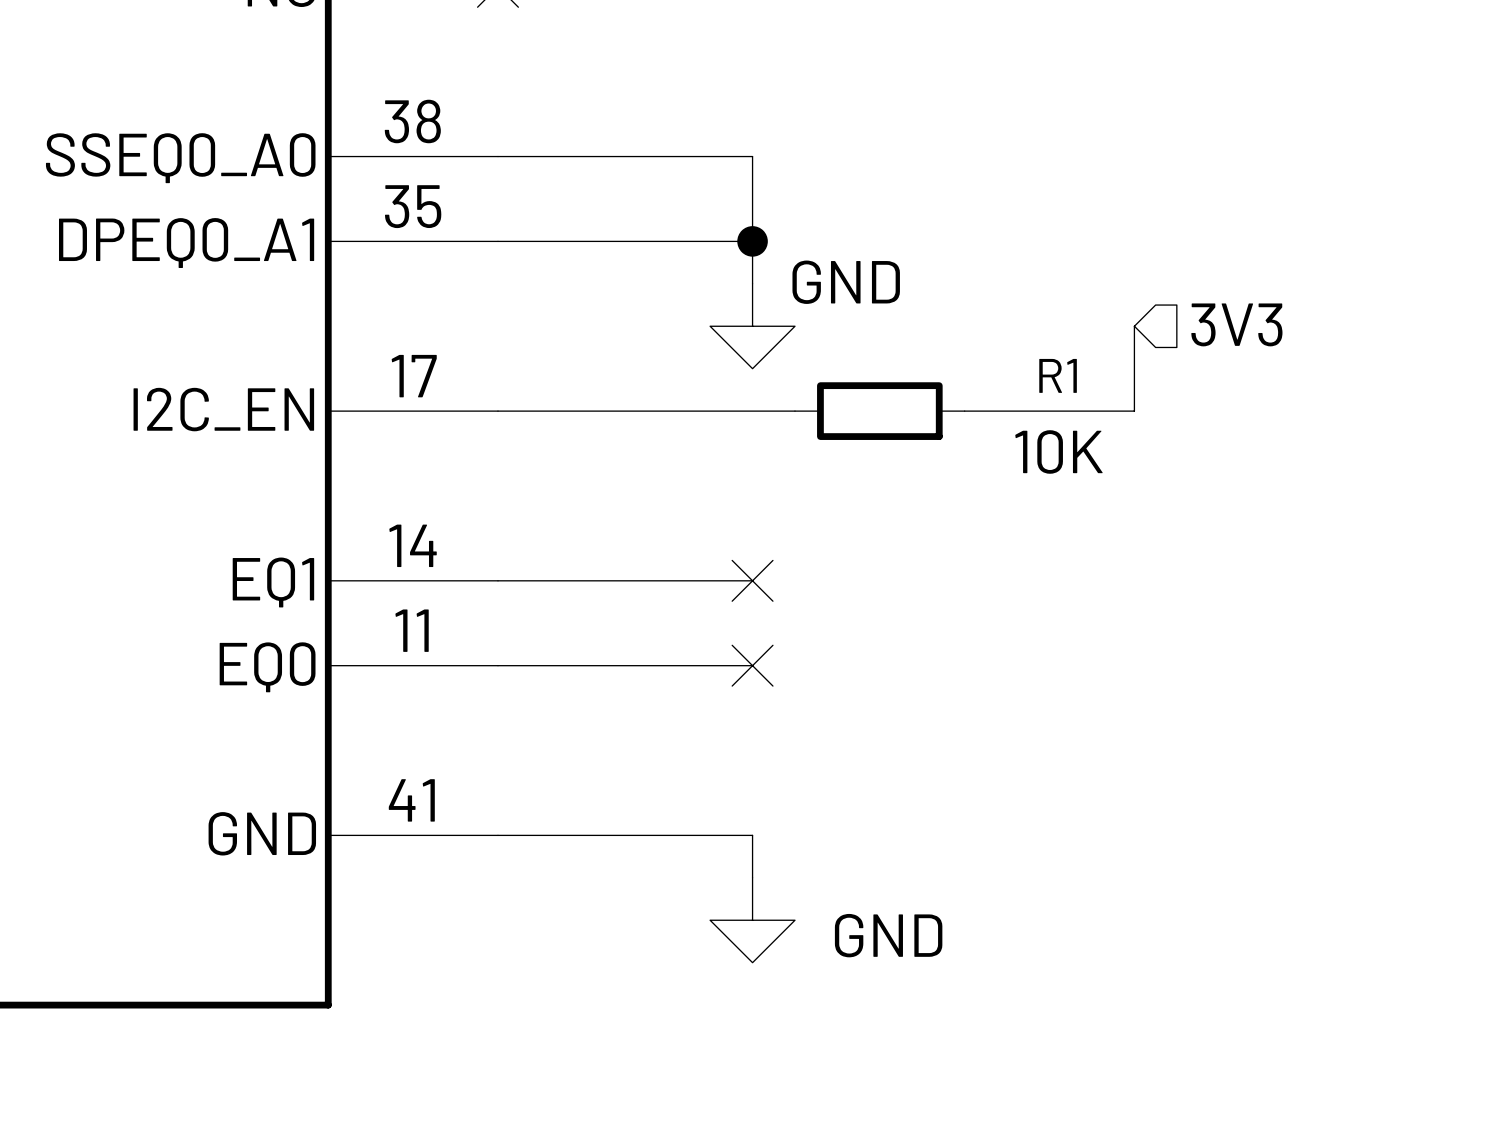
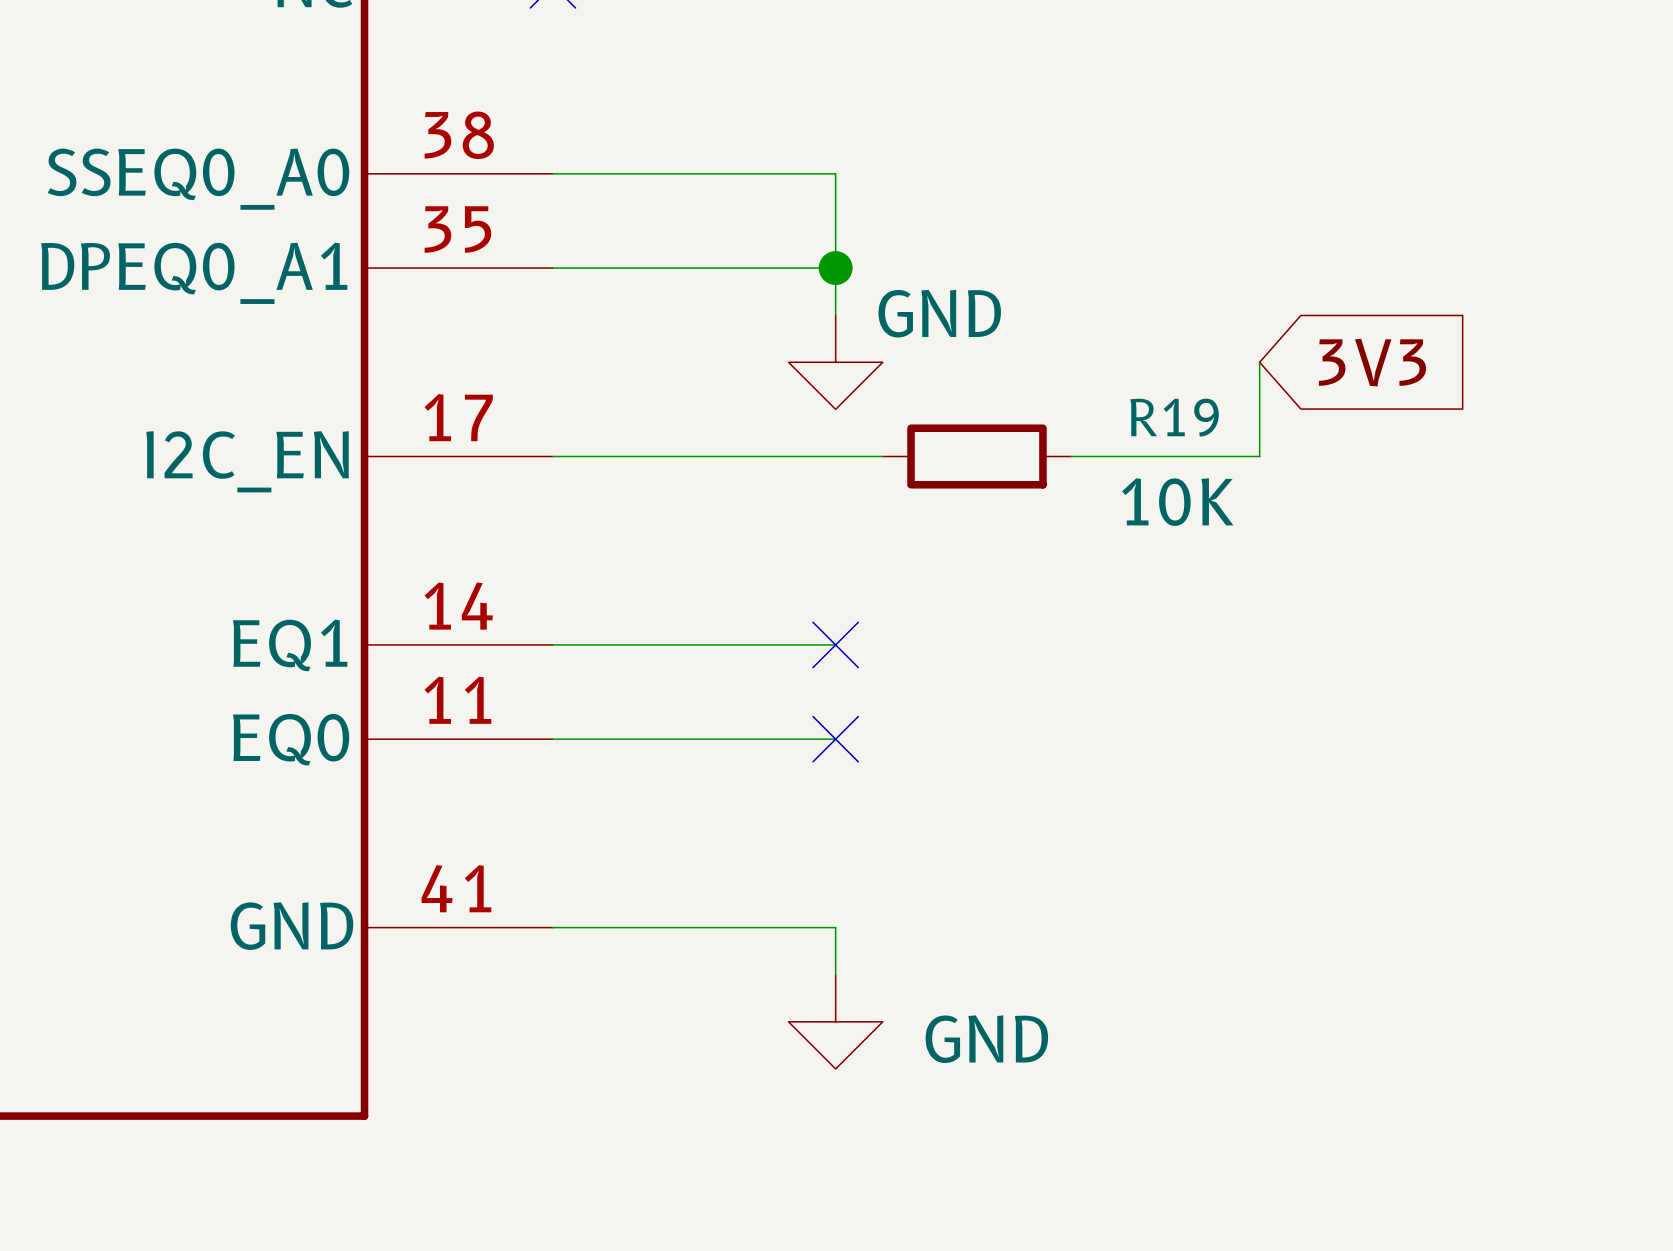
hierarchical label: 3V3 (1236, 324) -> none
global label: none -> 3V3 (1372, 362)
R1 name: R1 (1058, 375) -> R19 (1174, 417)

